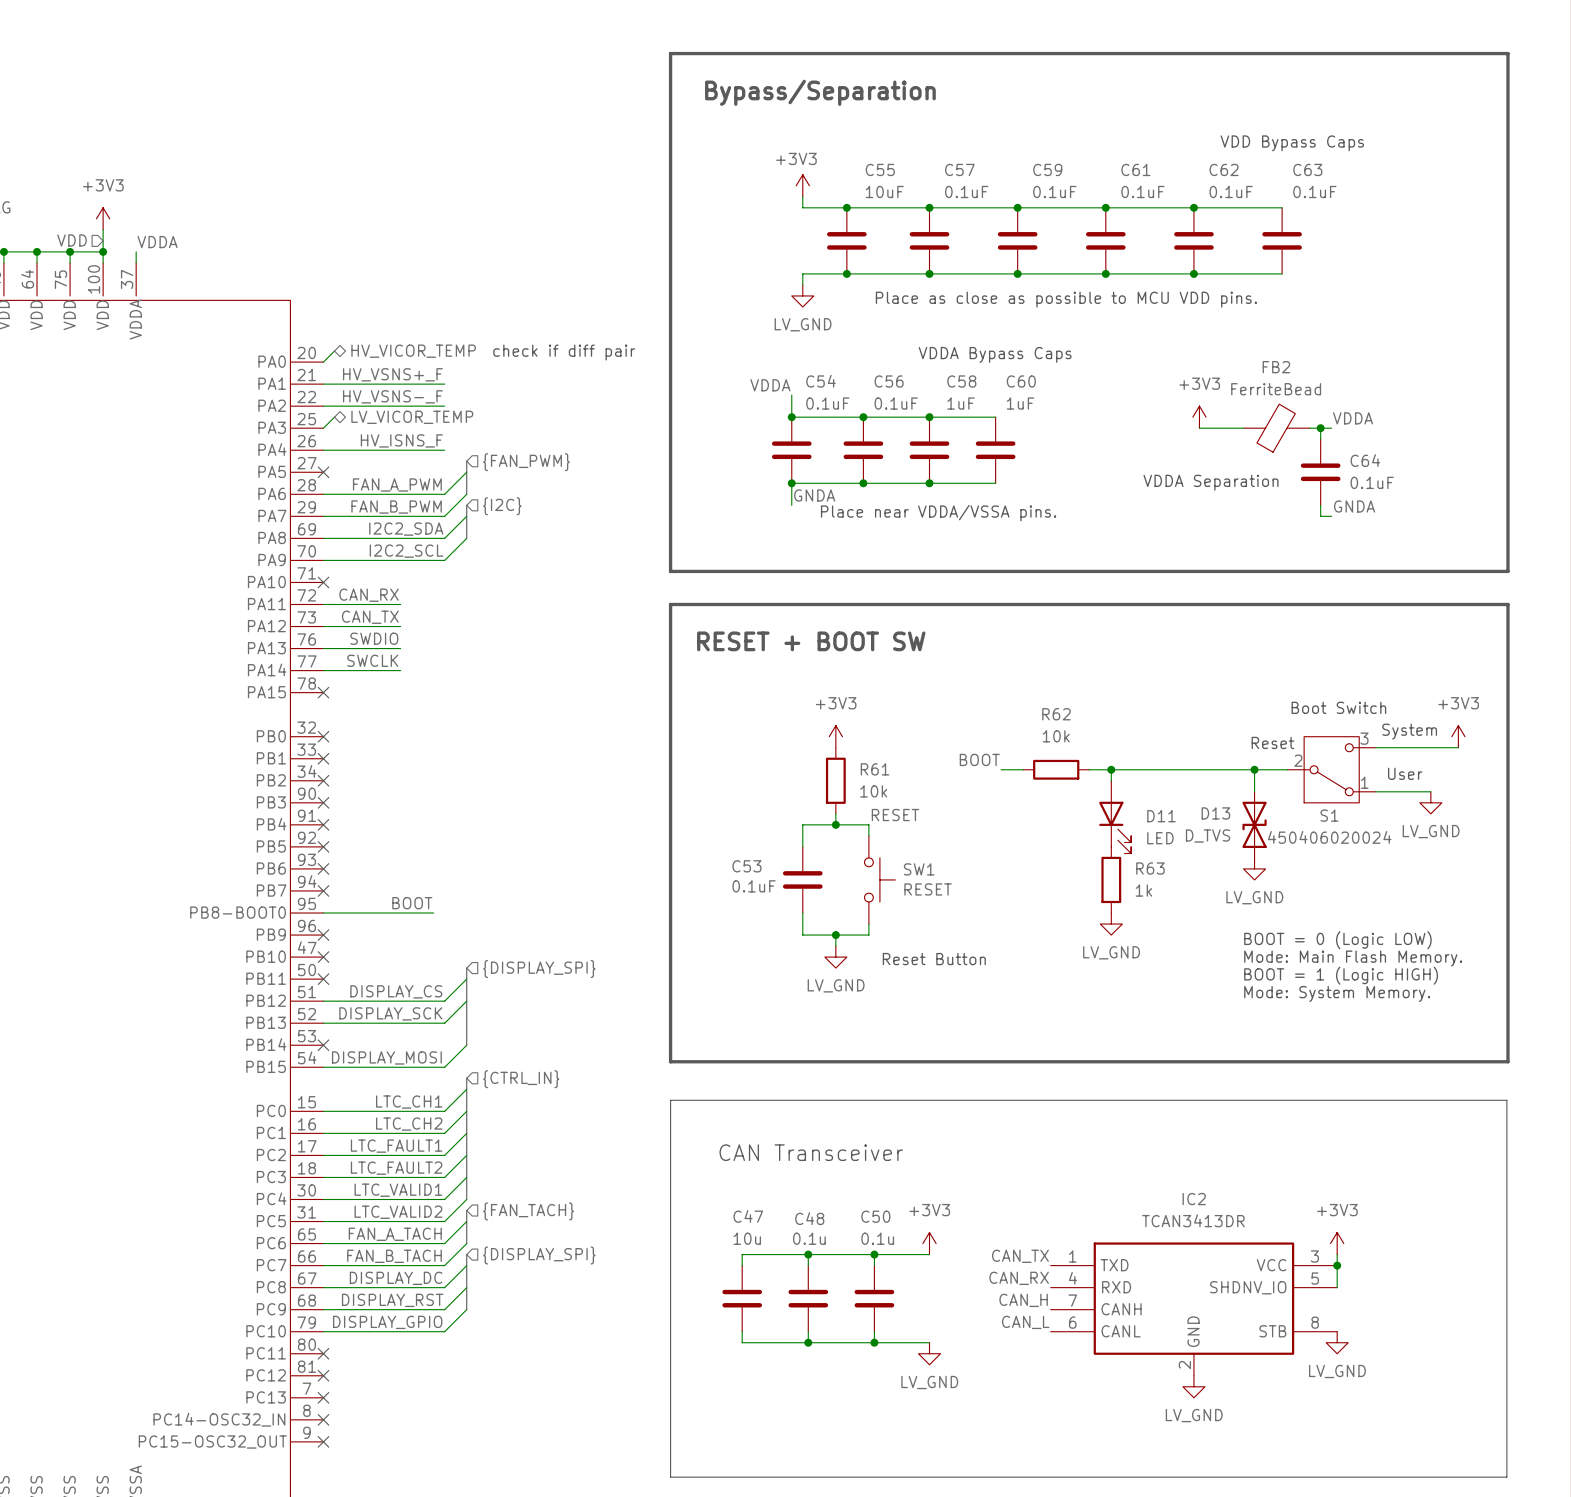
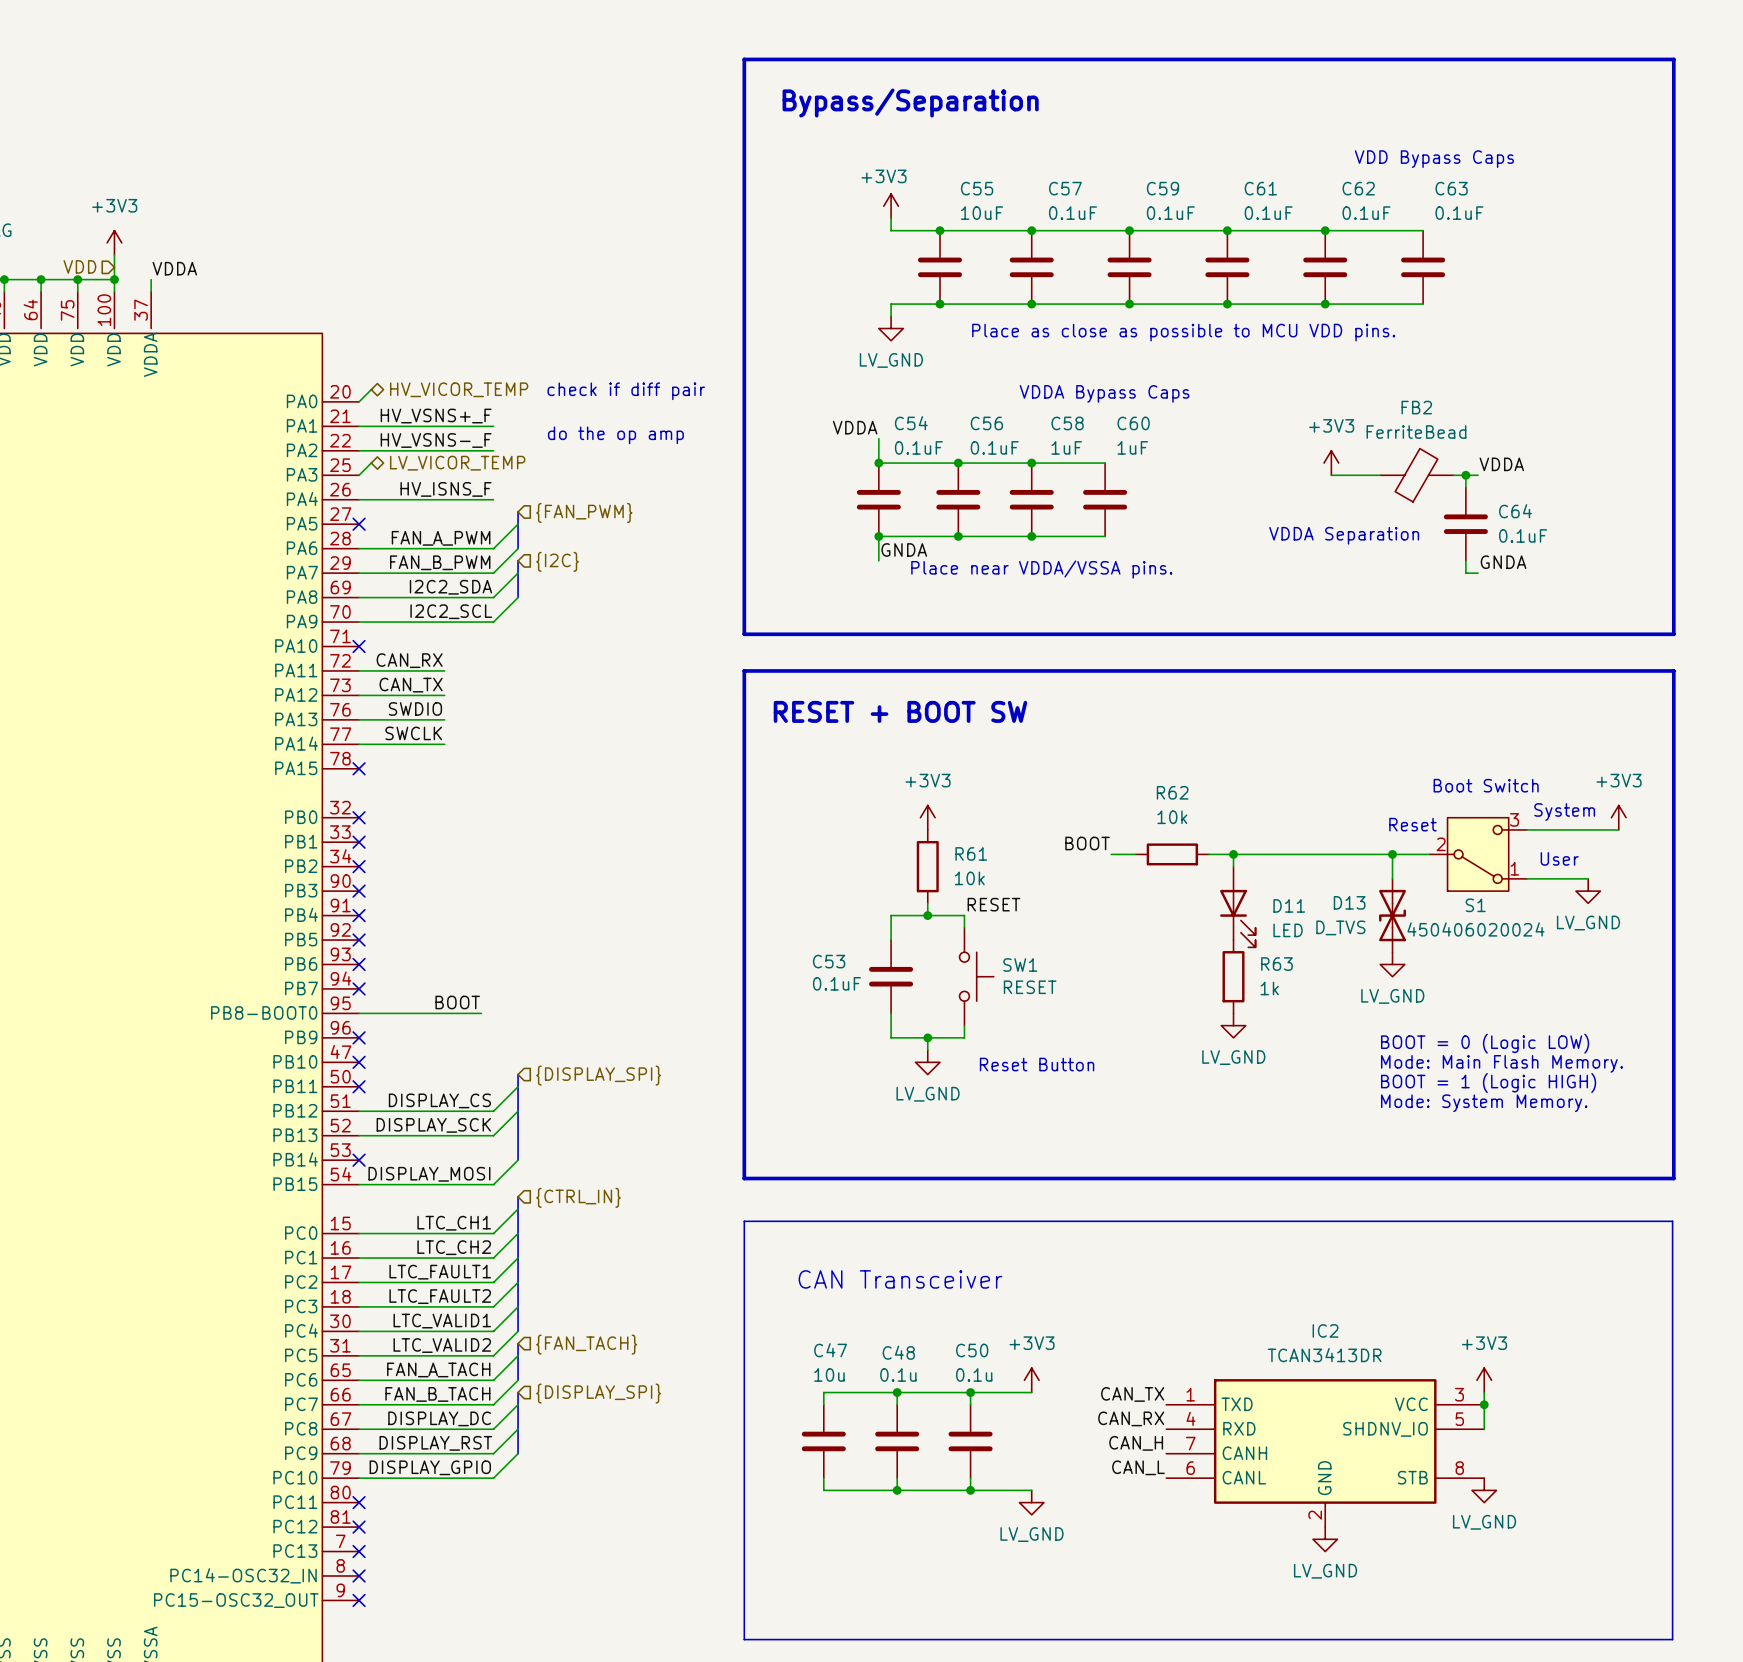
text: none -> do the op amp (615, 435)

